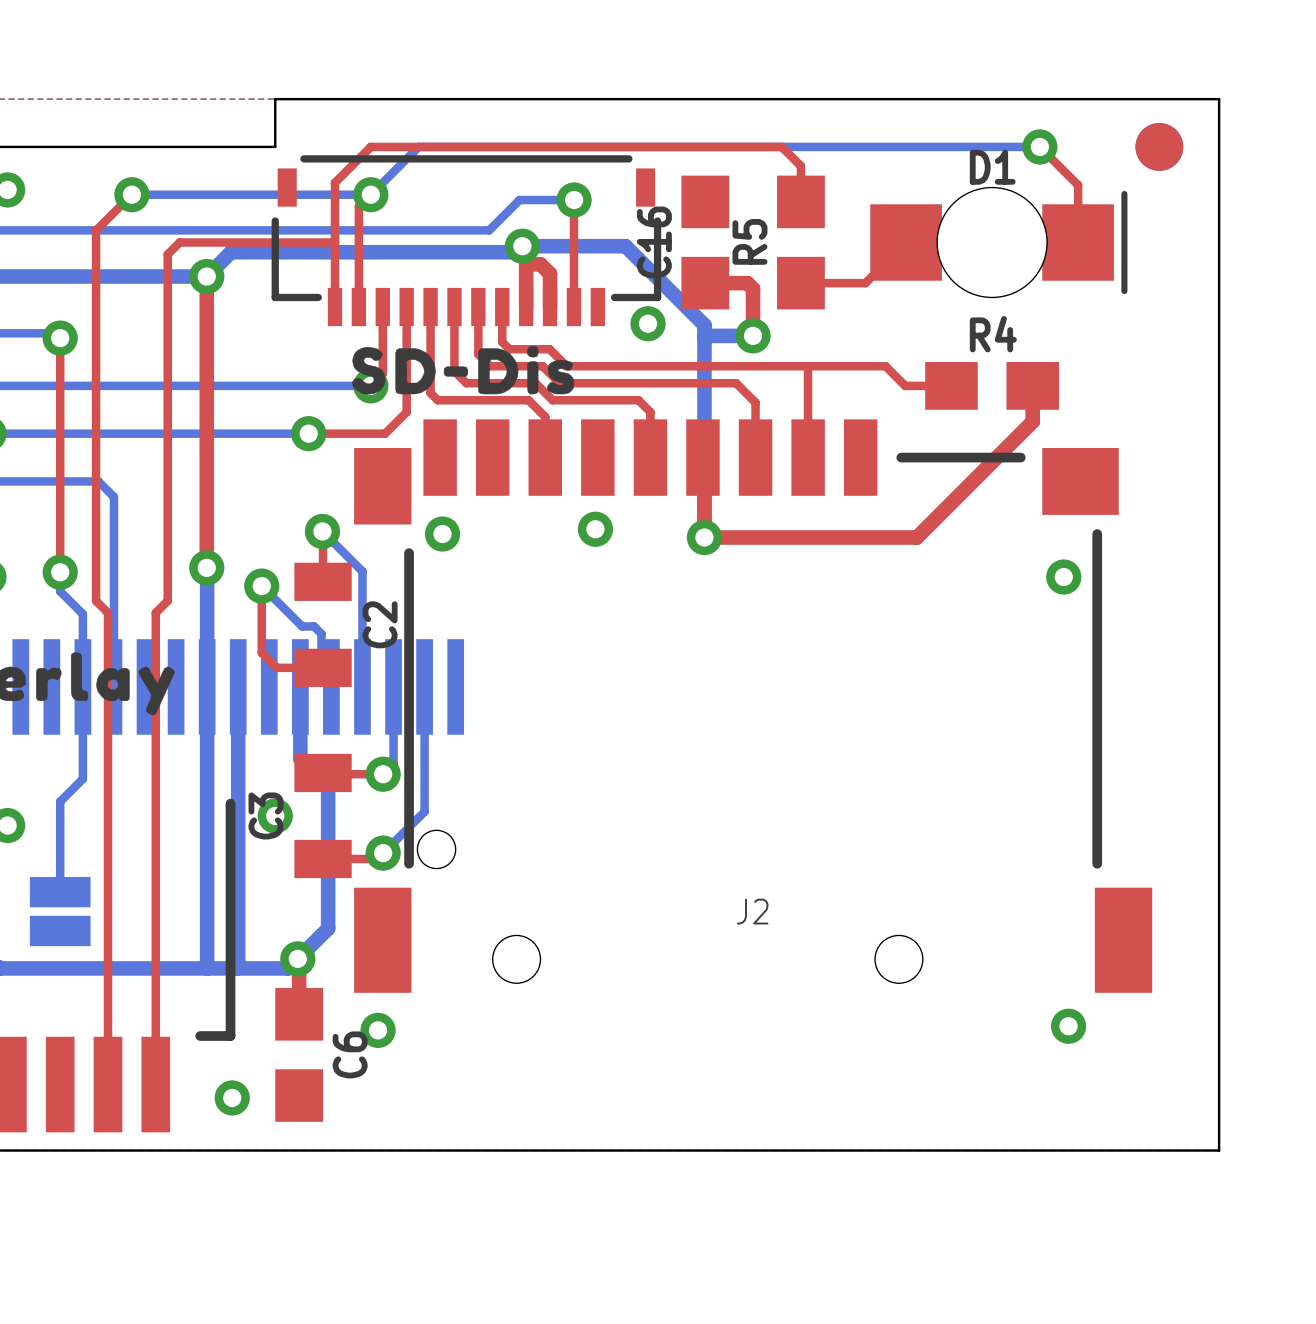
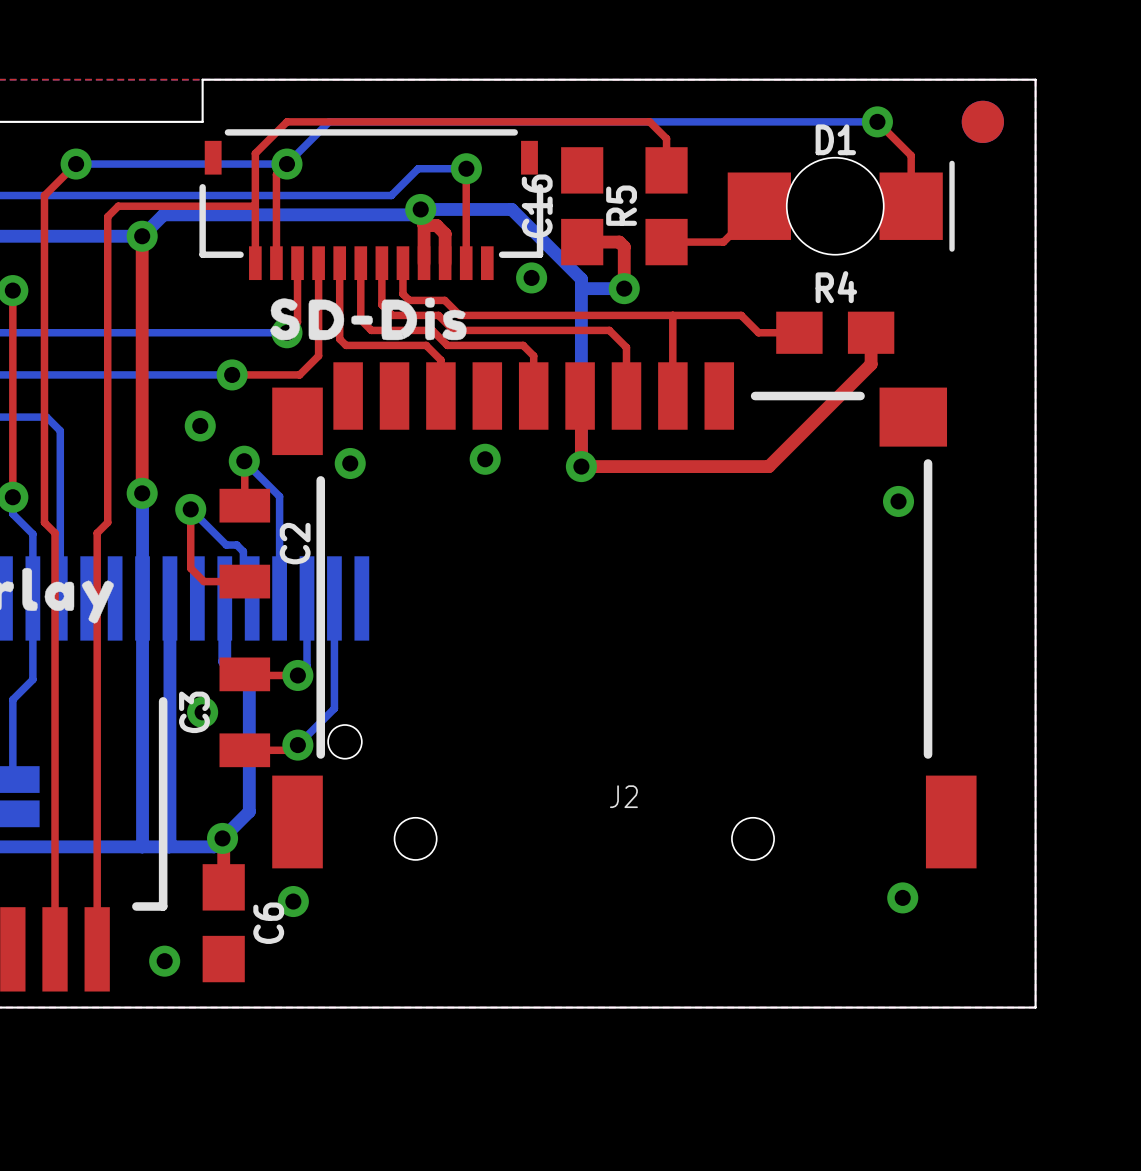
via: none -> (200, 426)

